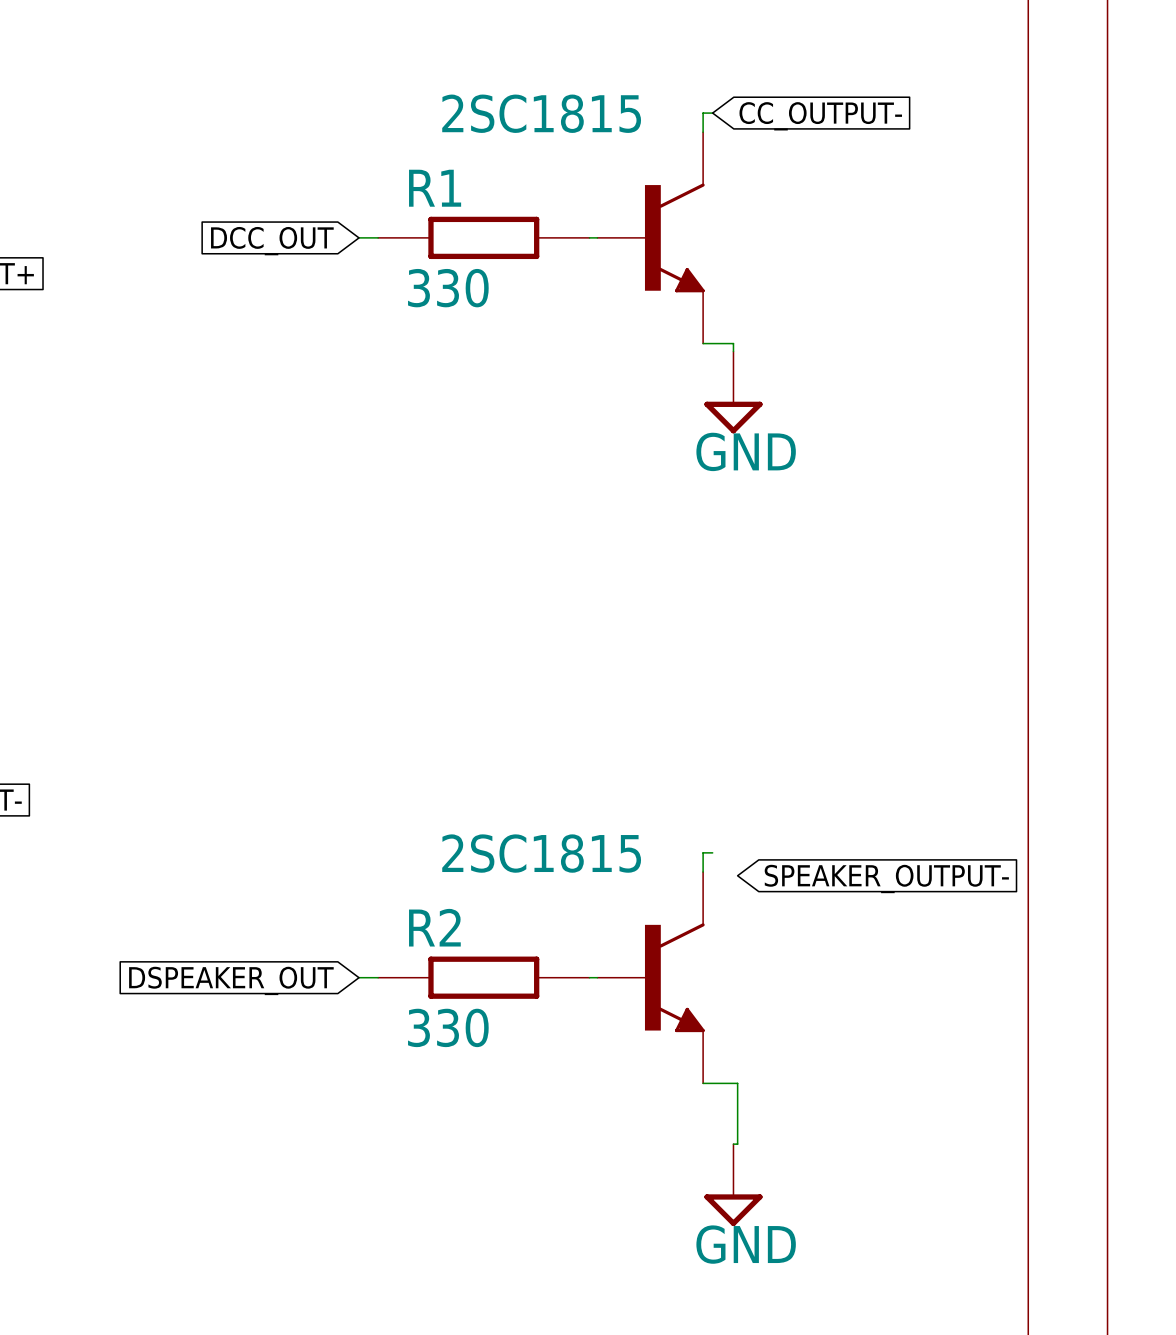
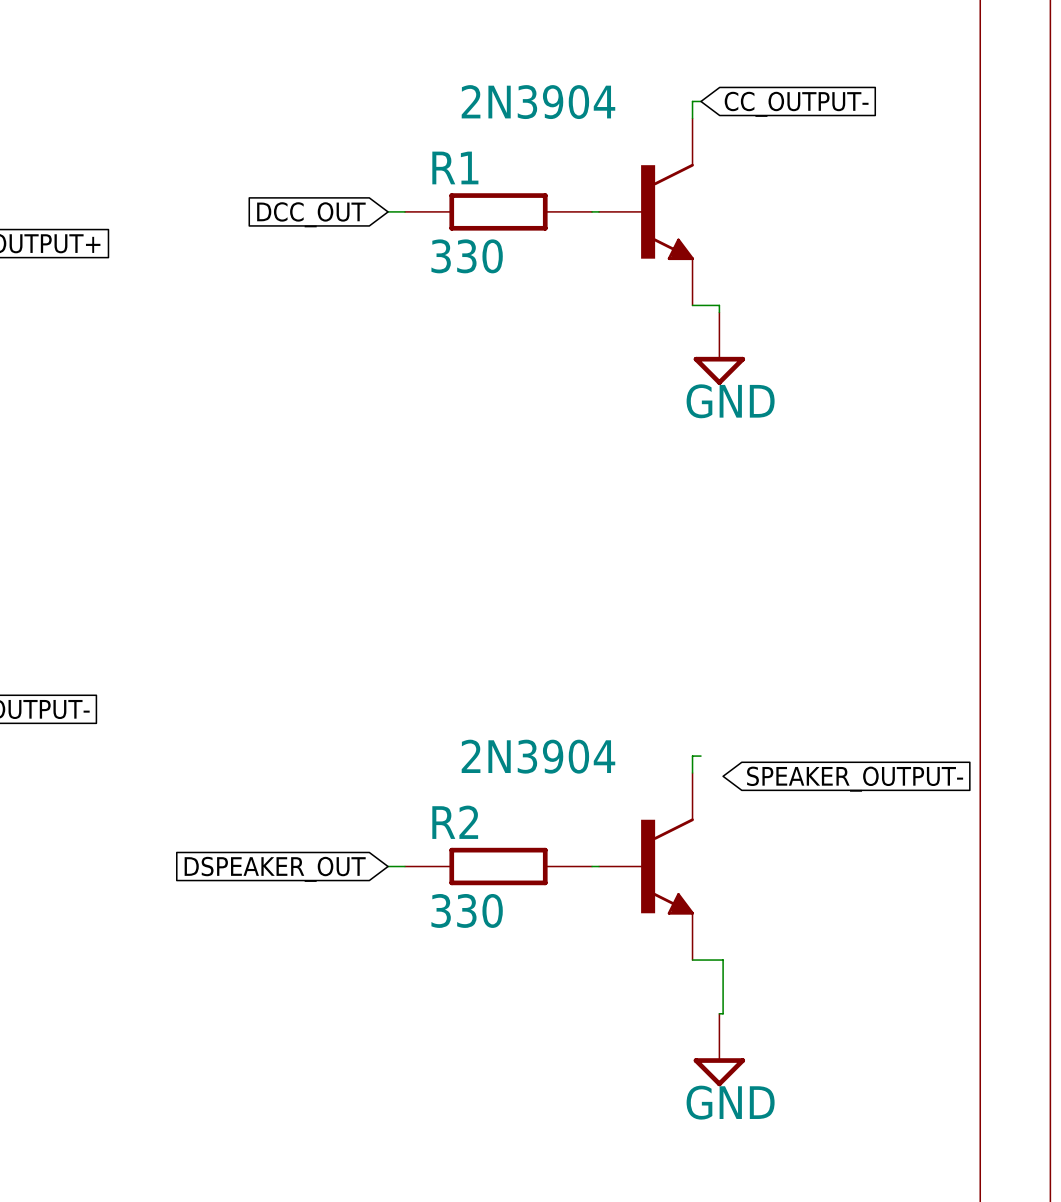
part value: 2SC1815 (541, 113) -> 2N3904 (538, 102)
part value: 2SC1815 (541, 853) -> 2N3904 (538, 756)

